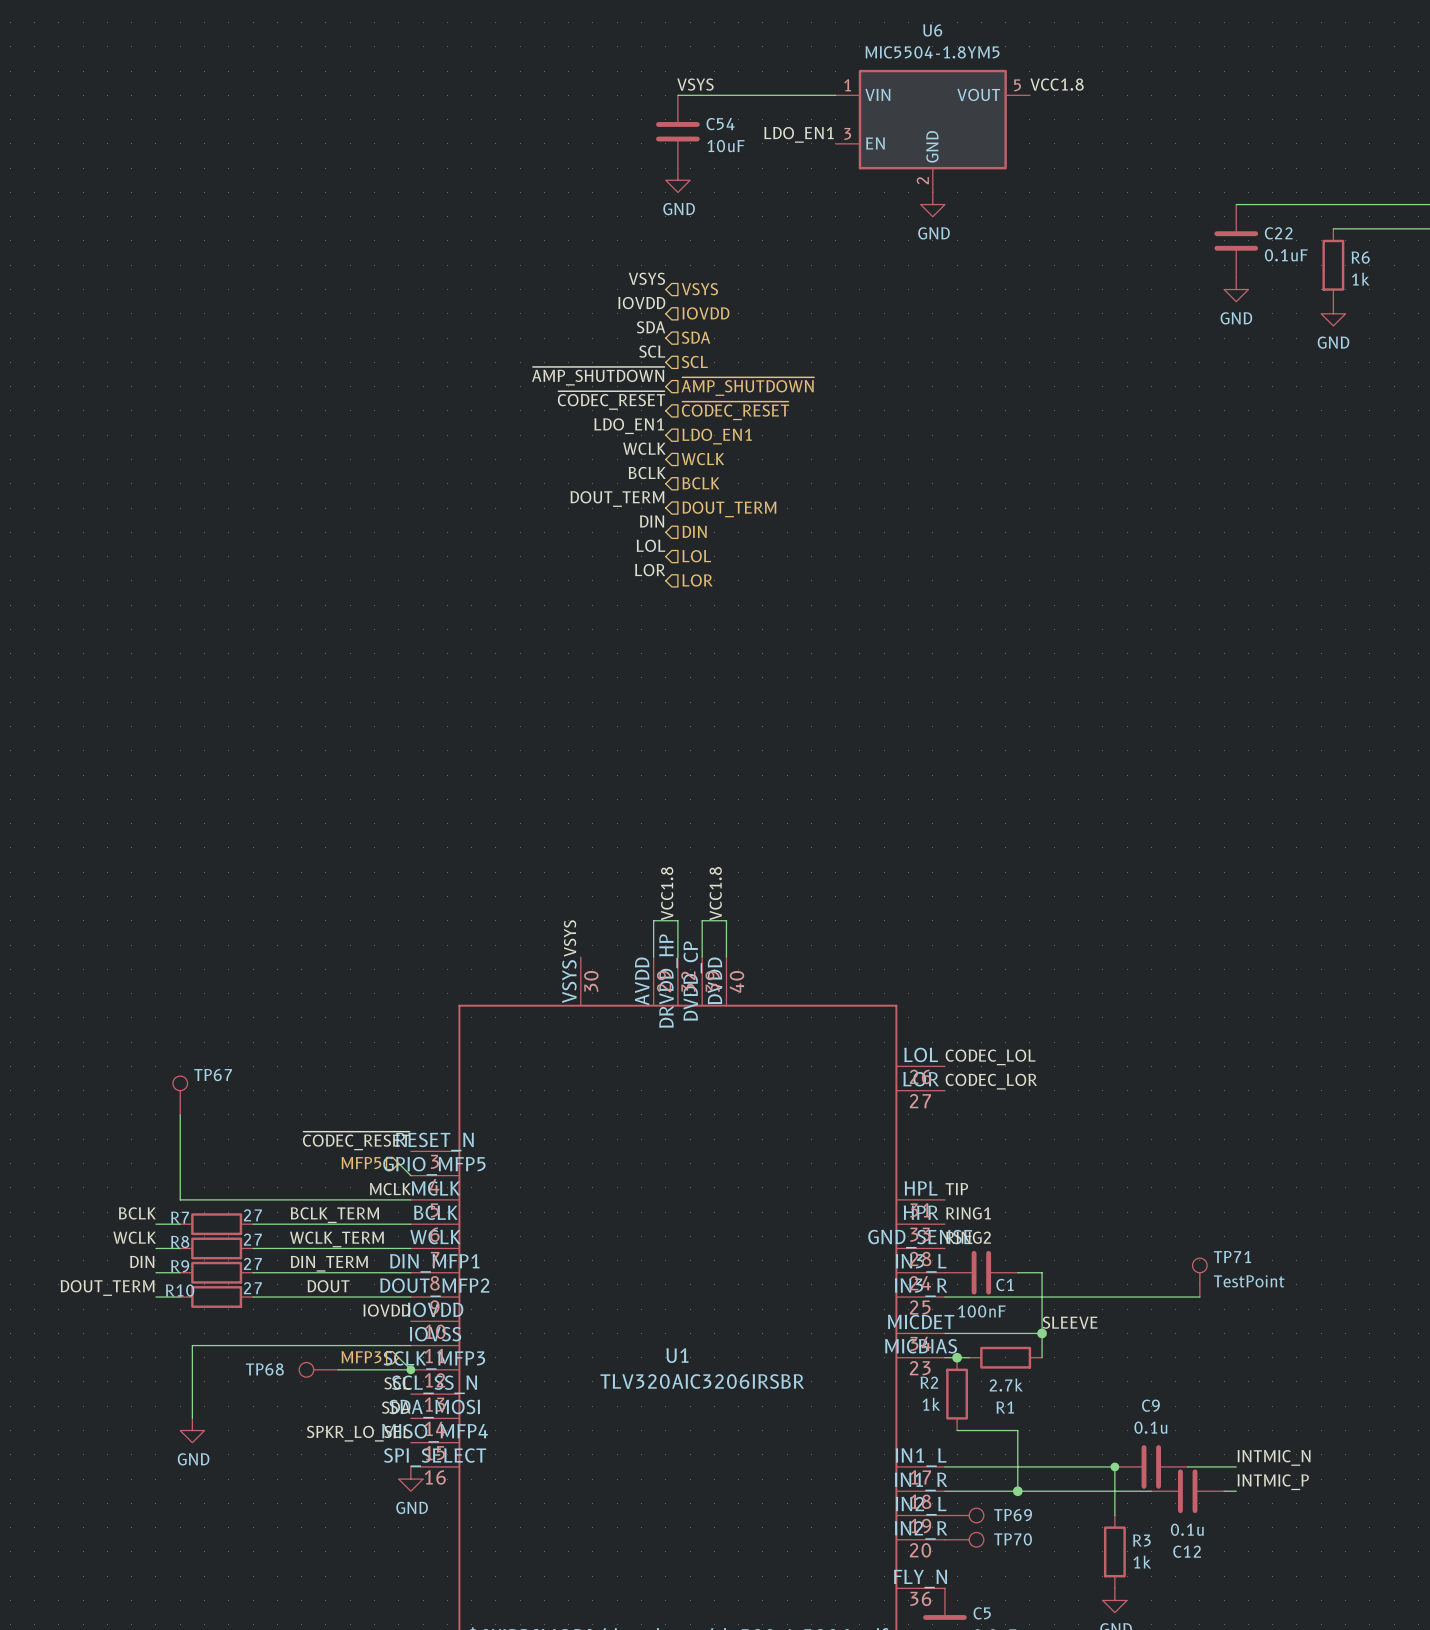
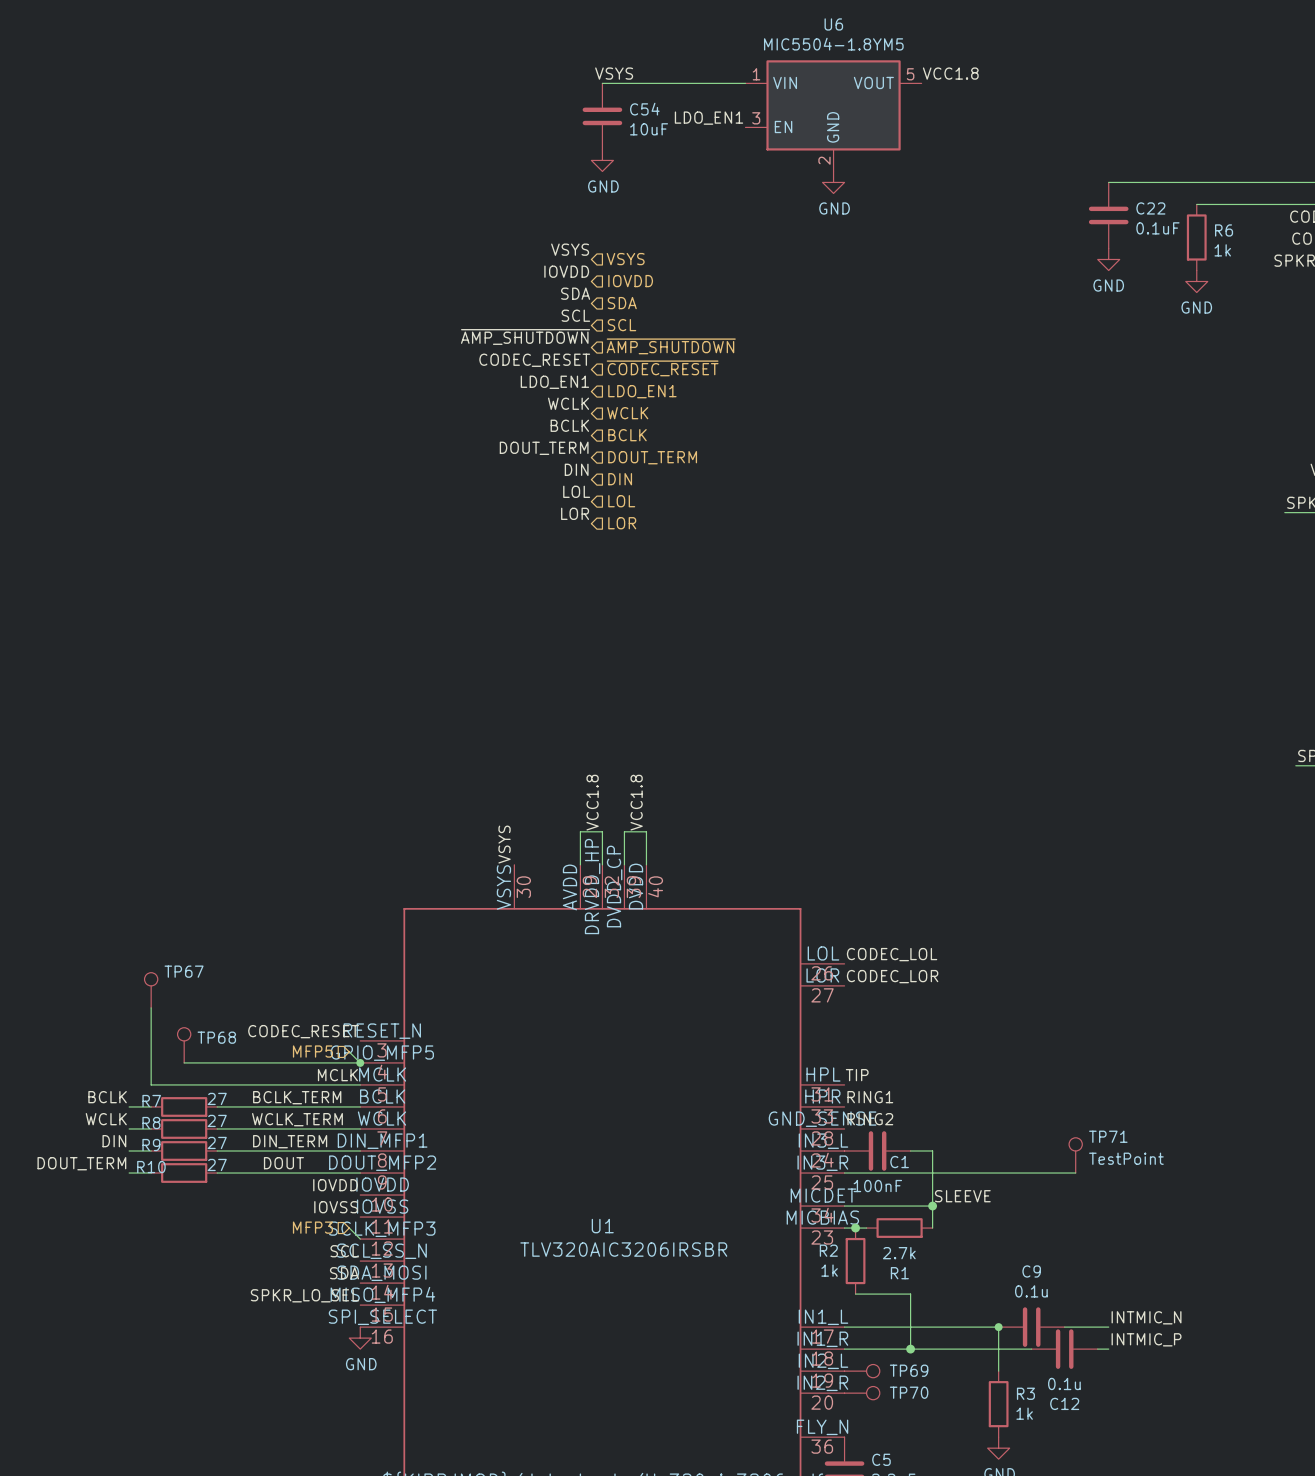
label: ~{CODEC_RESET} (611, 400) -> CODEC_RESET (534, 360)
label: ~{CODEC_RESET} (356, 1140) -> CODEC_RESET (303, 1031)
wire: none -> (184, 1062) (360, 1062)
junction: none -> (360, 1062)
label: none -> IOVSS (336, 1207)
wire: (410, 1345) (192, 1345) (192, 1418) -> none
TP68 name position: TP68 (264, 1369) -> TP68 (216, 1037)
TP68 rotation: 0° (306, 1369) -> 90° clockwise (184, 1034)
TP68 position: (318, 1369) -> (184, 1045)
wire: (338, 1369) (410, 1369) -> none
junction: (410, 1369) -> none
power symbol: GND (192, 1430) -> none

